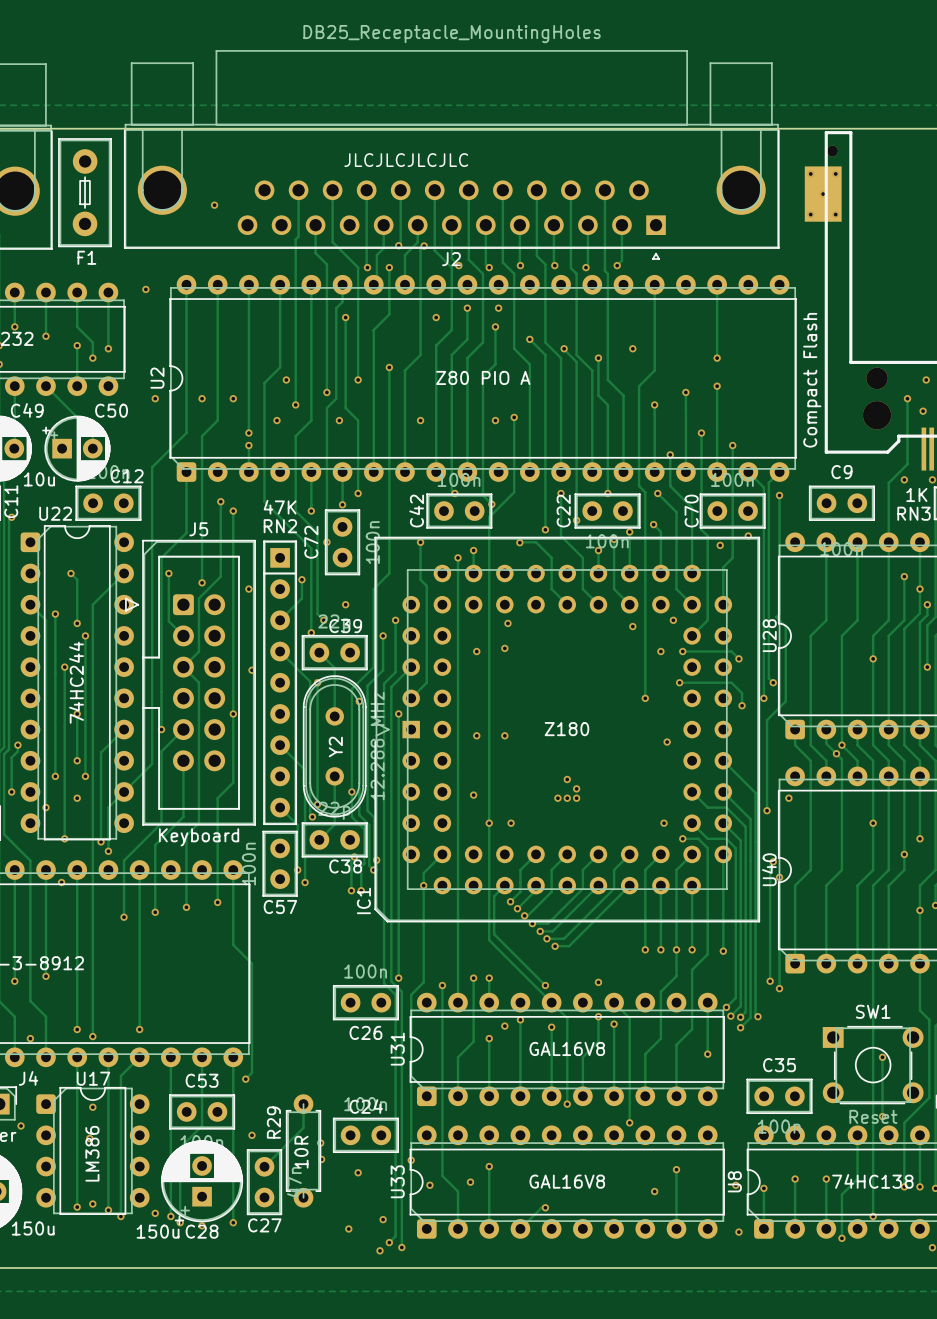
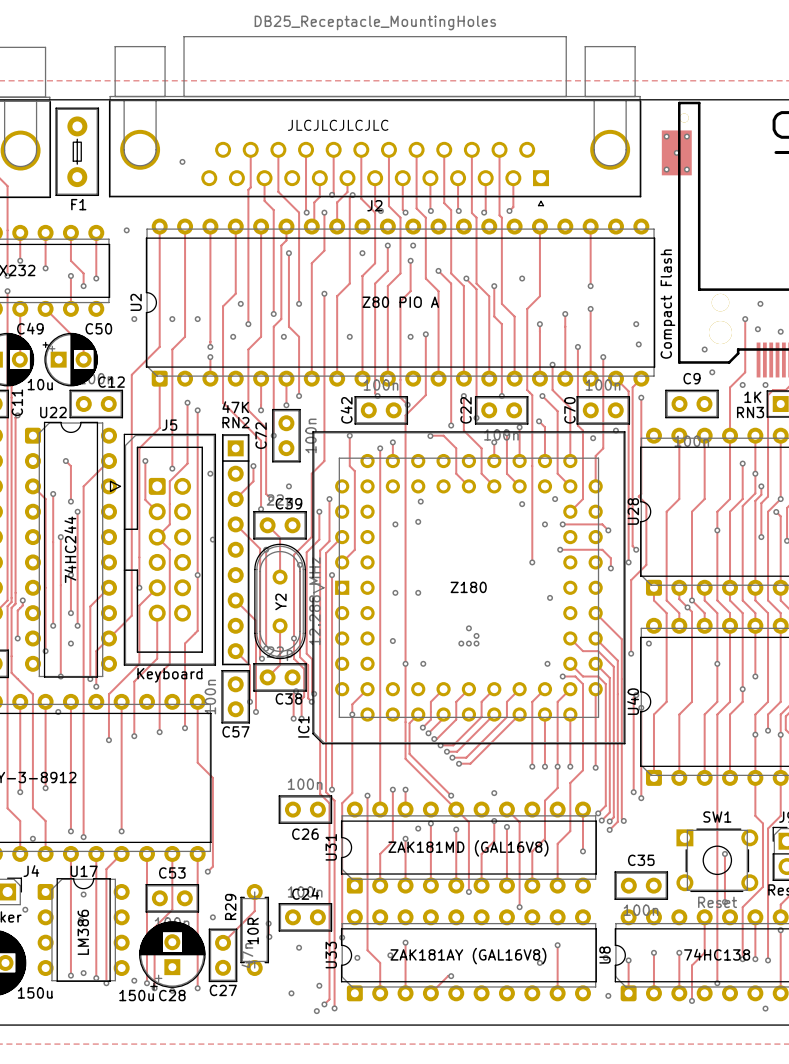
via: none -> (636, 324)
via: none -> (638, 344)
via: none -> (704, 349)
via: none -> (712, 372)
U31 value: GAL16V8 (567, 1048) -> ZAK181MD (GAL16V8) (468, 848)
U33 value: GAL16V8 (567, 1181) -> ZAK181AY (GAL16V8) (468, 956)

